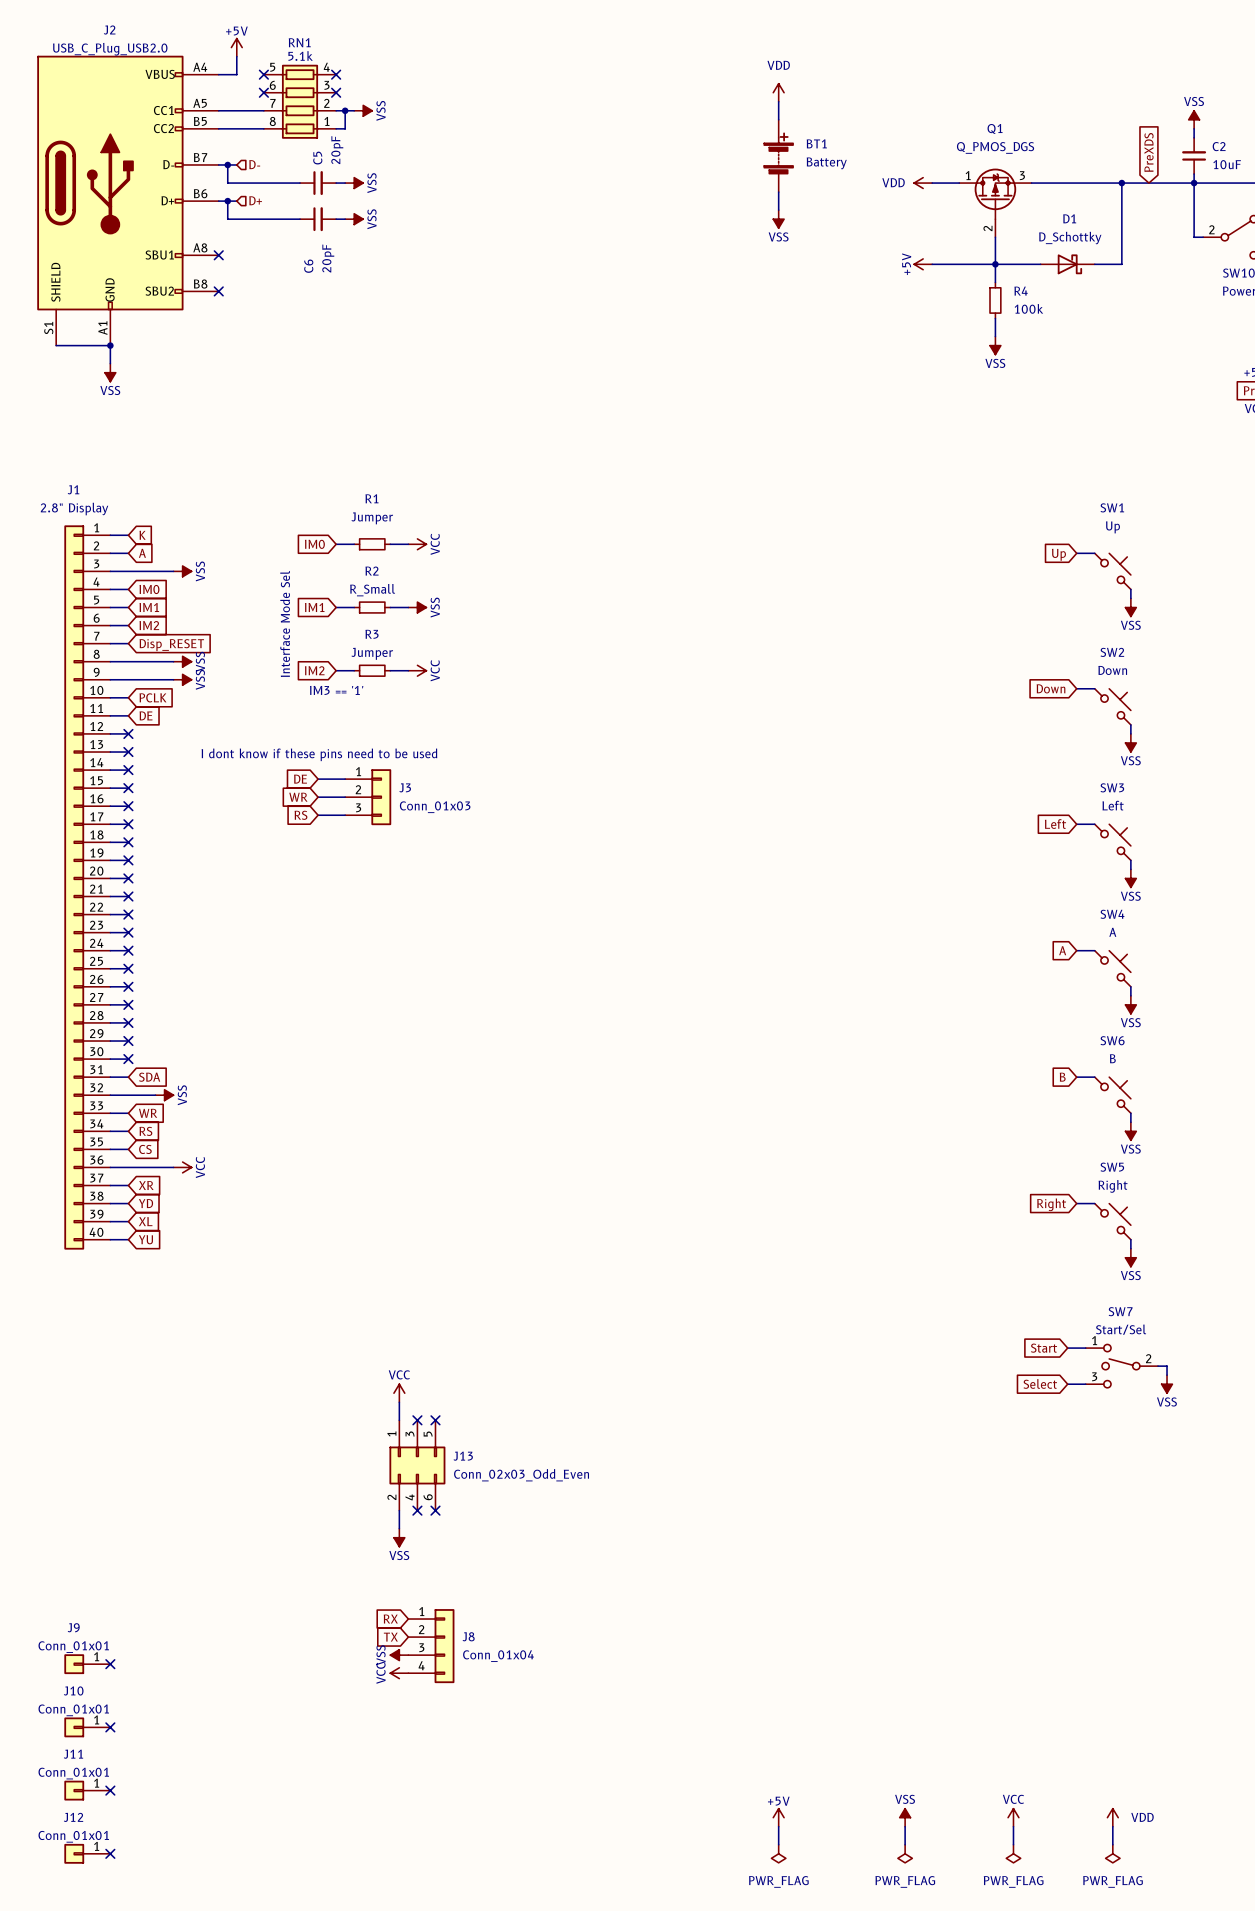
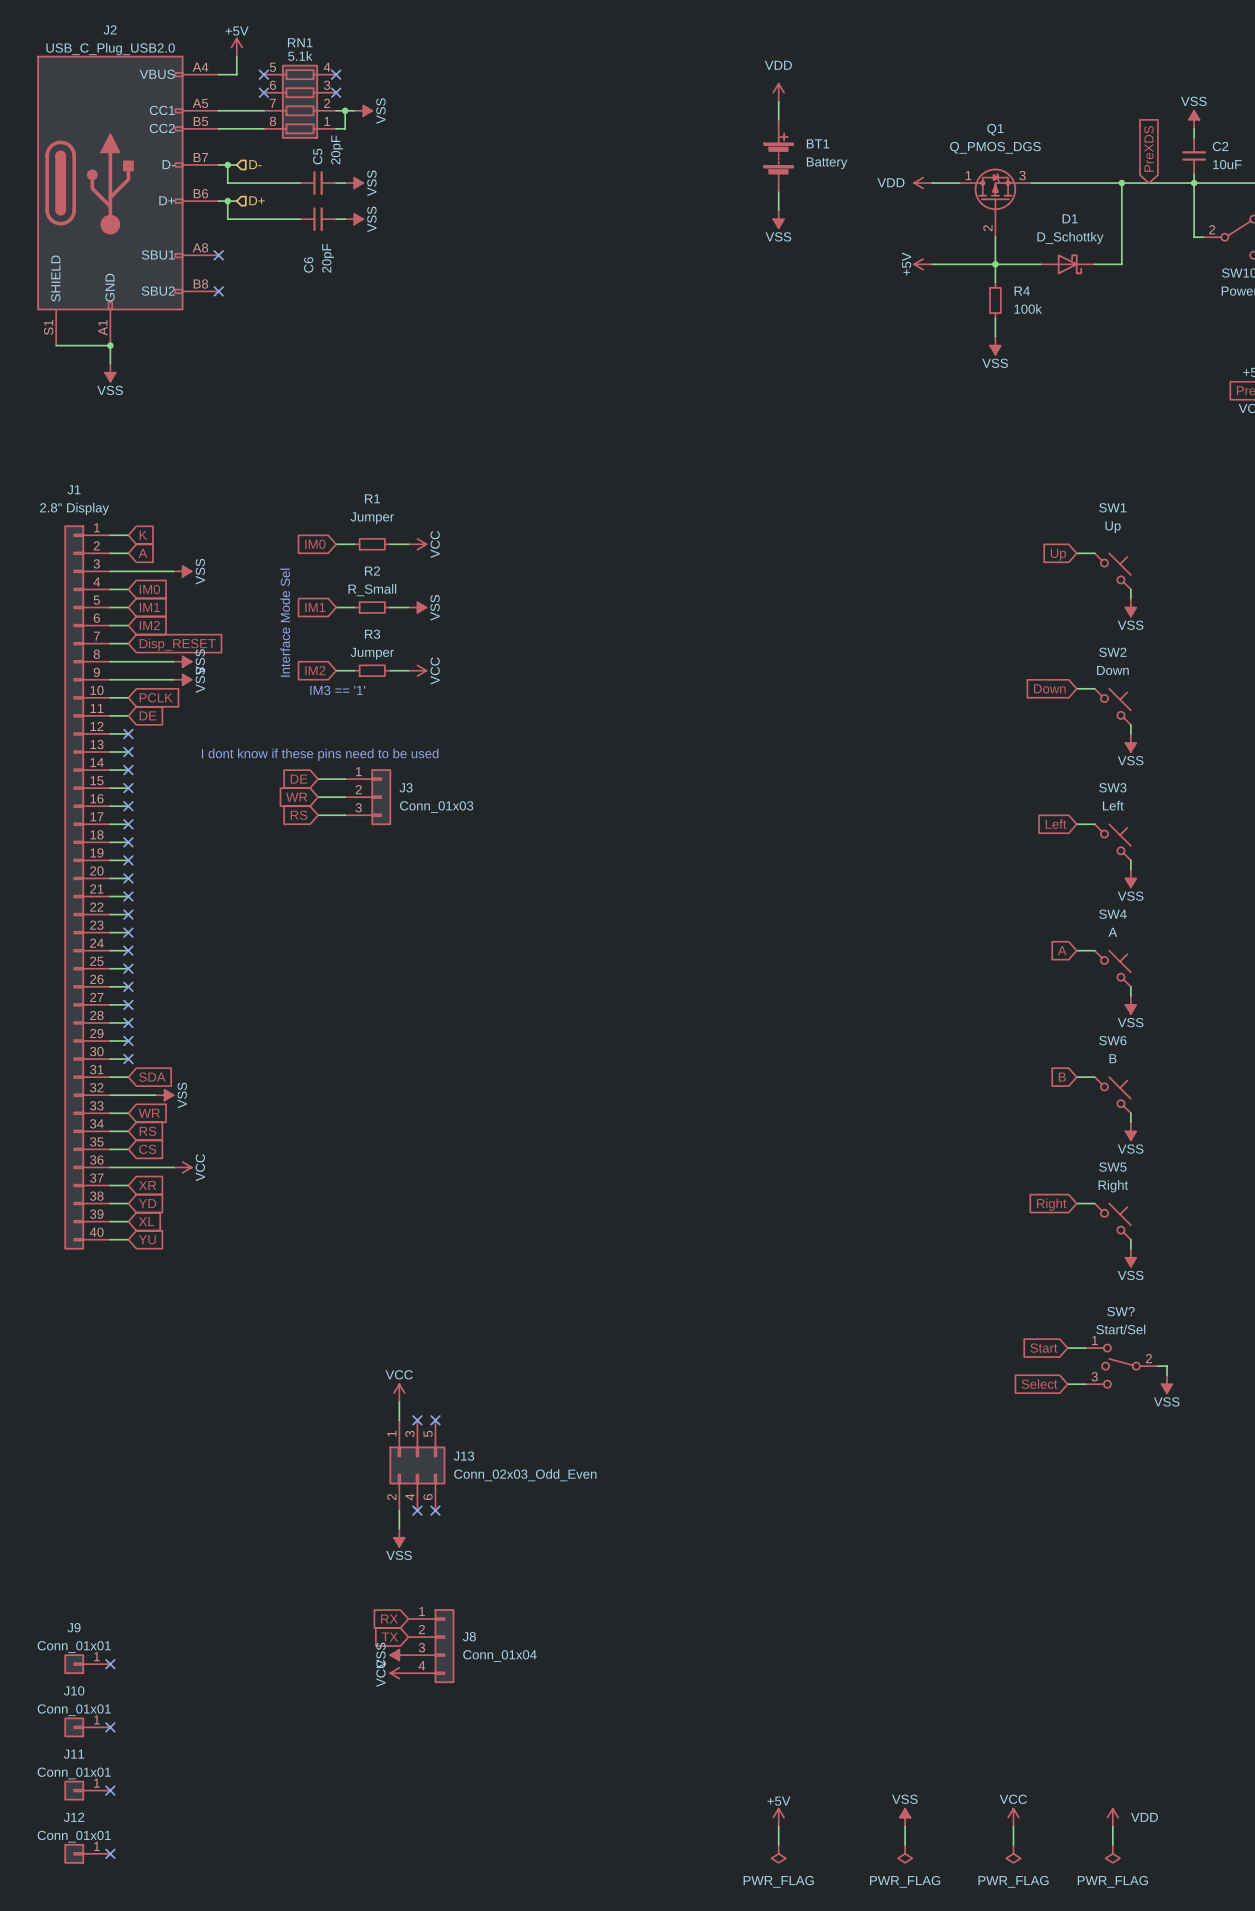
SW7 name: SW7 (1120, 1311) -> SW? (1121, 1311)

